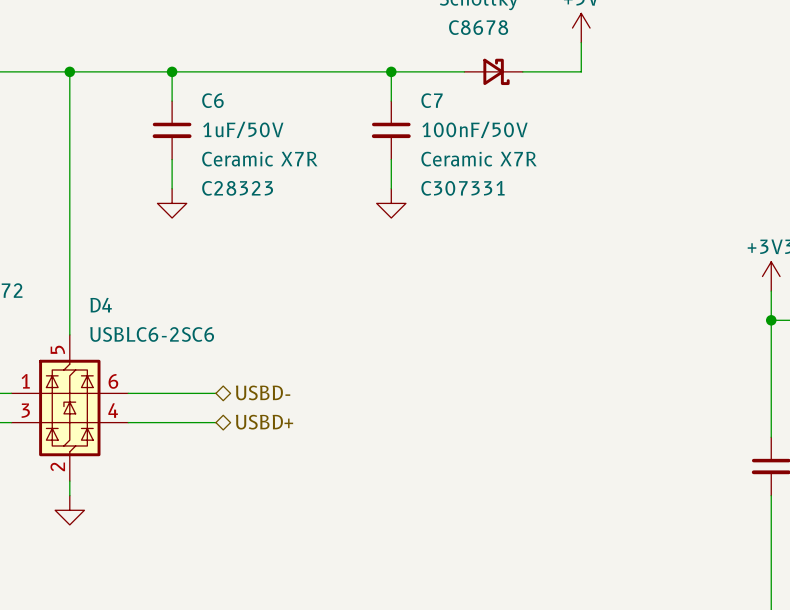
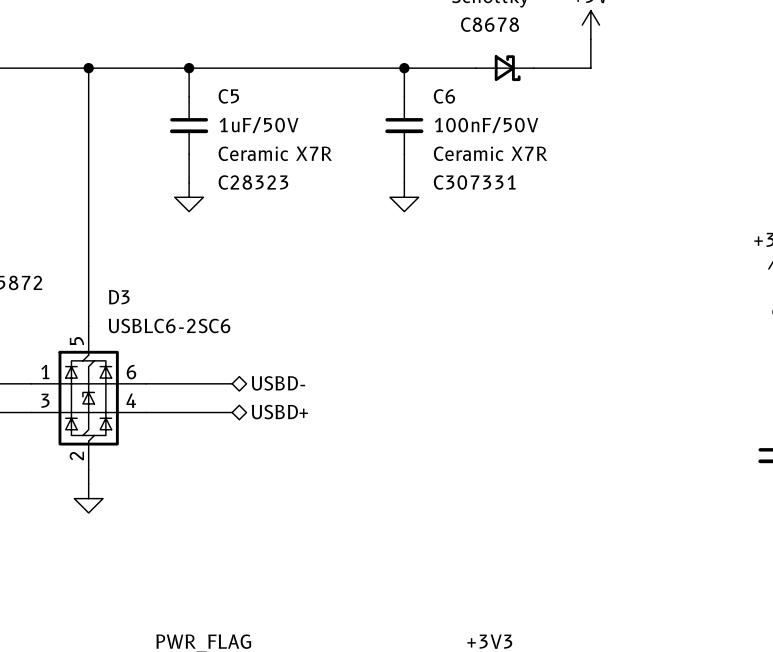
C6 name: C6 (212, 100) -> C5 (228, 96)
C7 name: C7 (432, 100) -> C6 (444, 96)
D4 name: D4 (101, 305) -> D3 (119, 297)

